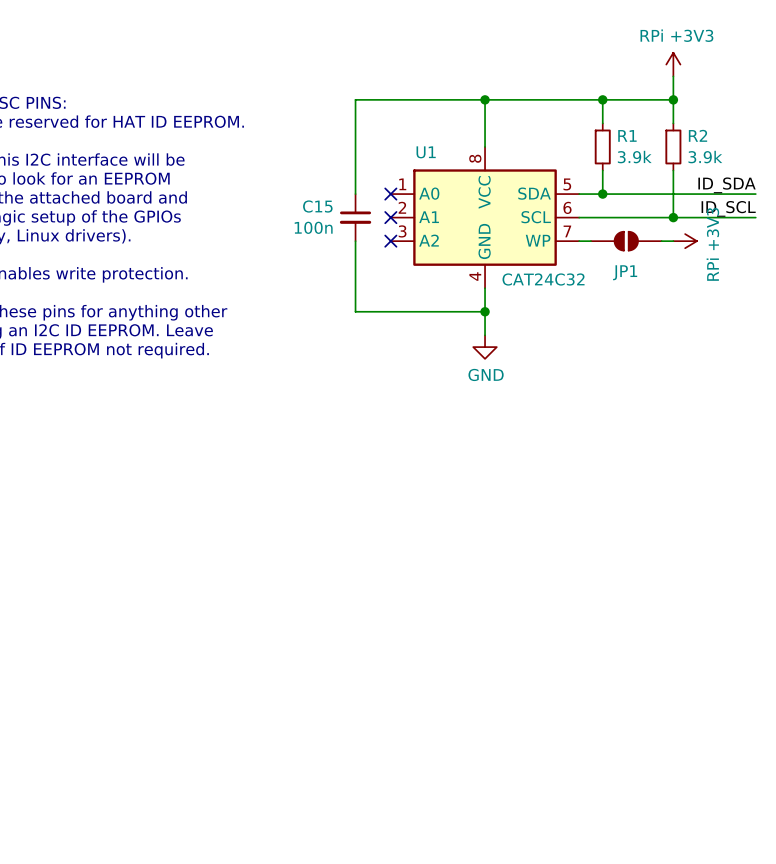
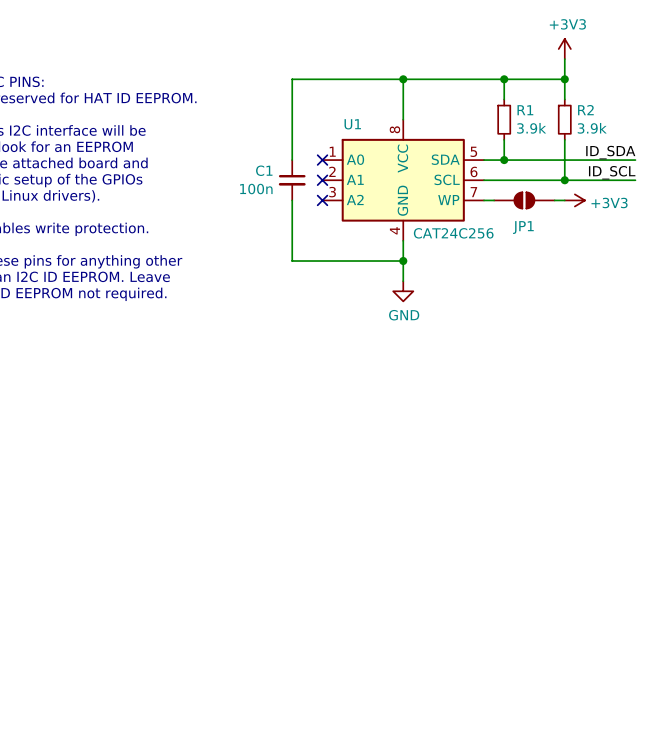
power symbol: RPi +3V3 (673, 64) -> +3V3 (564, 49)
C15 name: C15 (317, 206) -> C1 (264, 170)
power symbol: RPi +3V3 (685, 241) -> +3V3 (574, 200)
U1 value: CAT24C32 (543, 279) -> CAT24C256 (453, 233)

